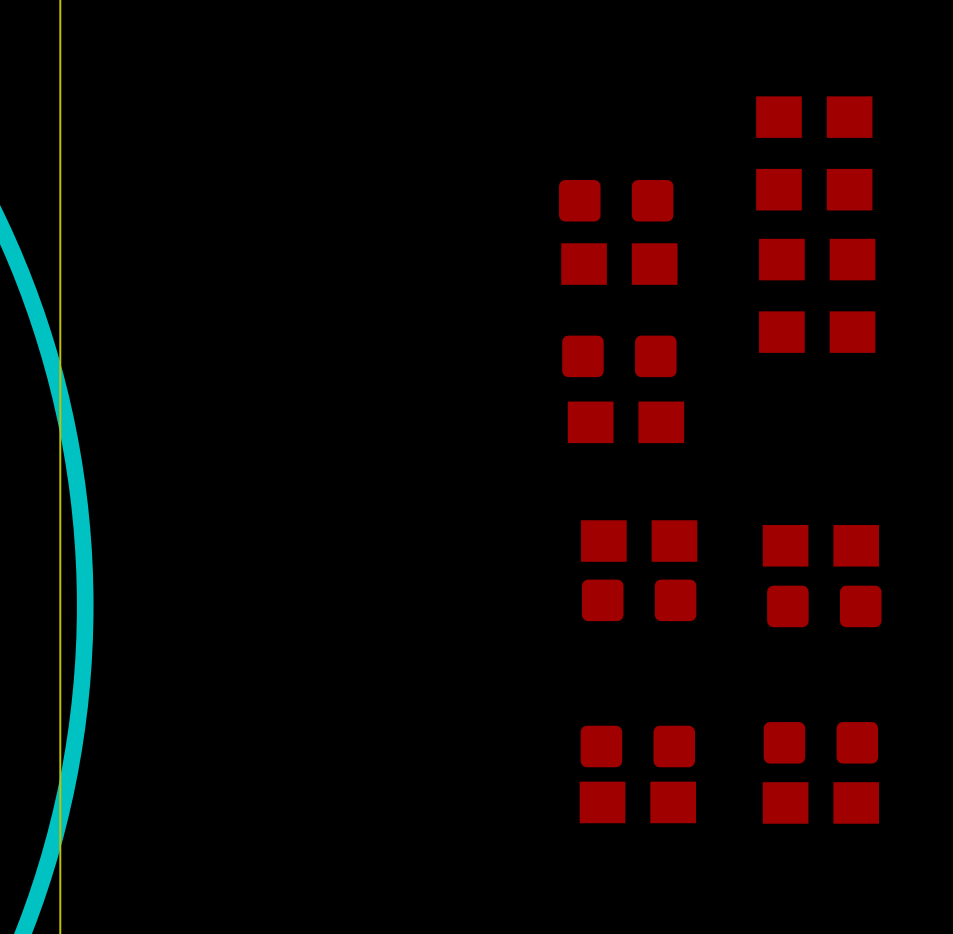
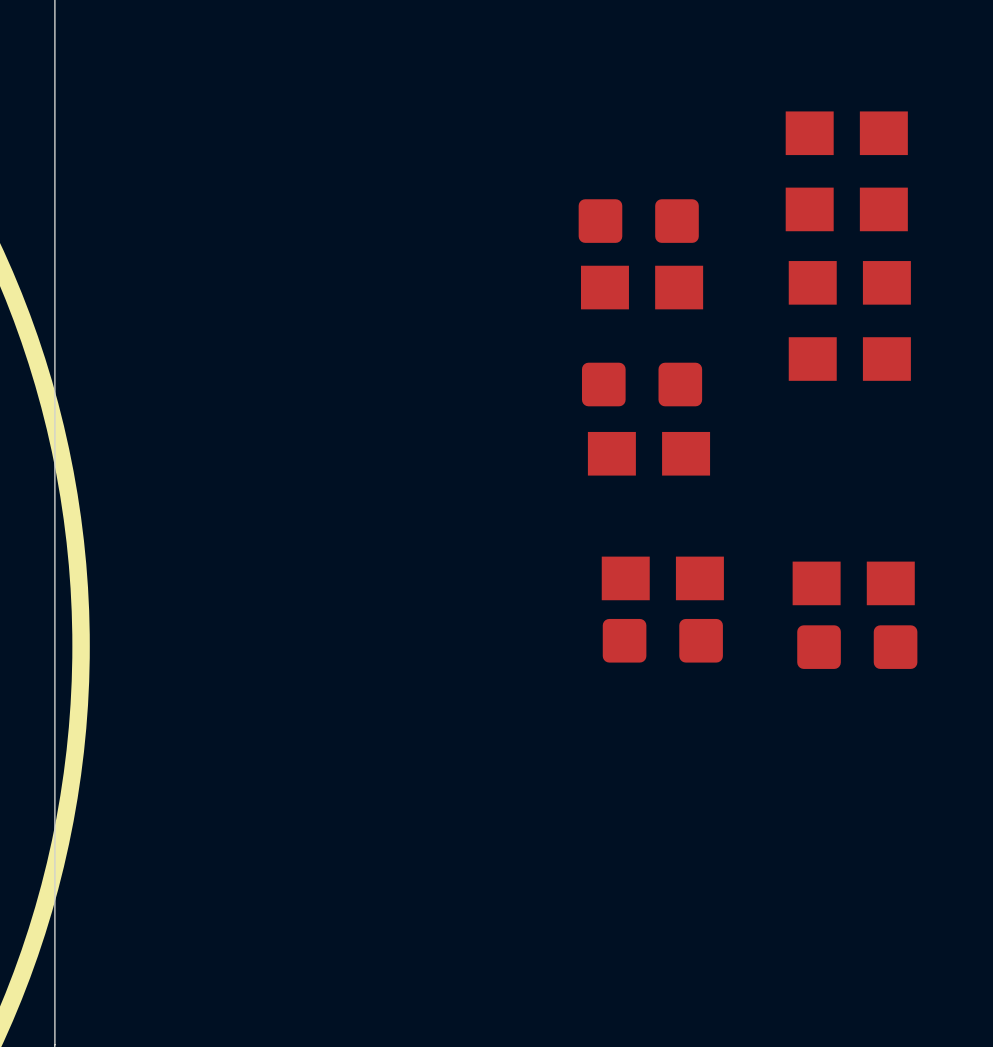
part: (820, 742) -> none
part: (637, 746) -> none
part: (637, 802) -> none
part: (820, 802) -> none

